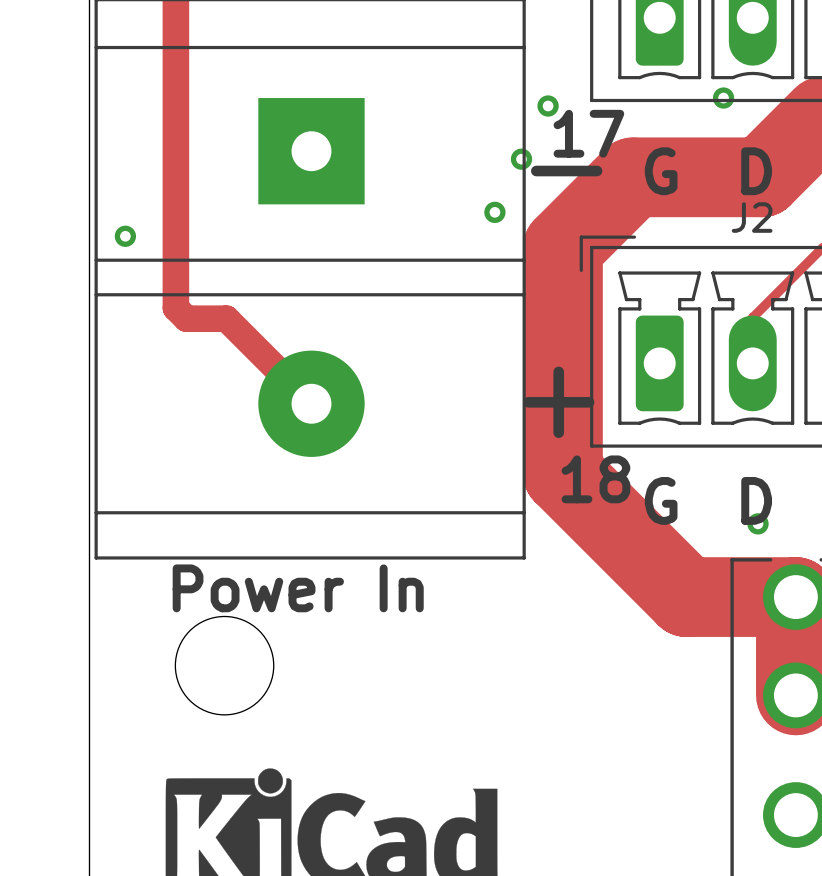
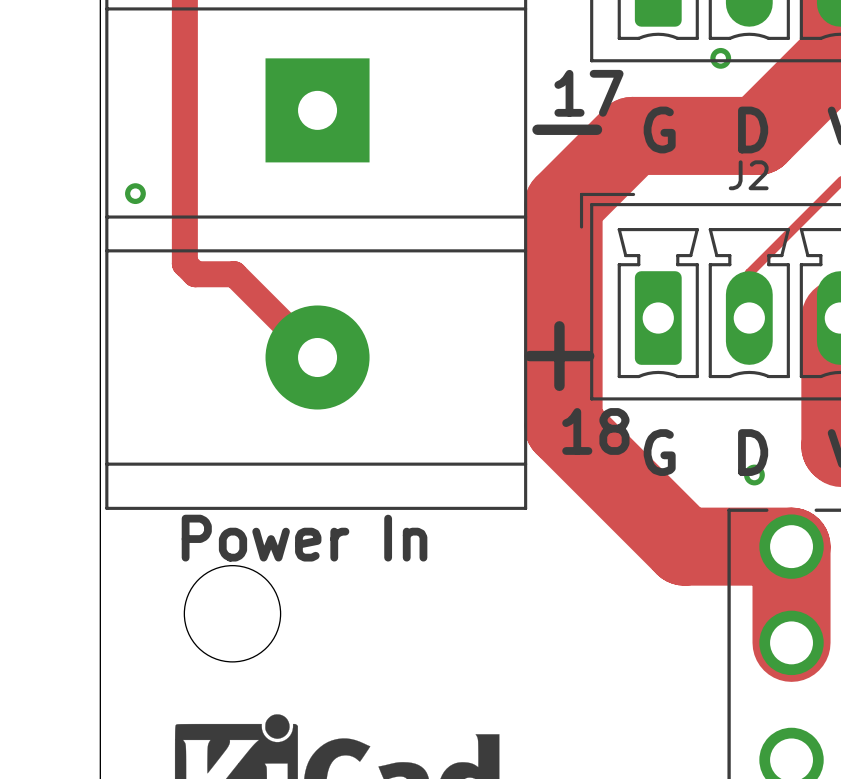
via: (548, 106) -> none
via: (521, 159) -> none
via: (494, 212) -> none

